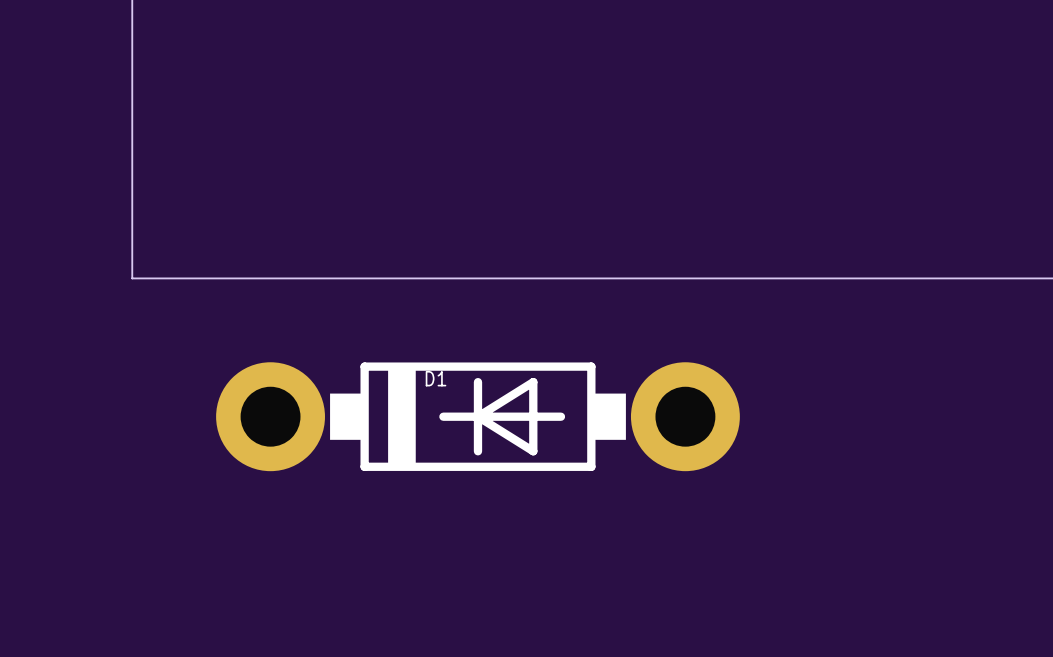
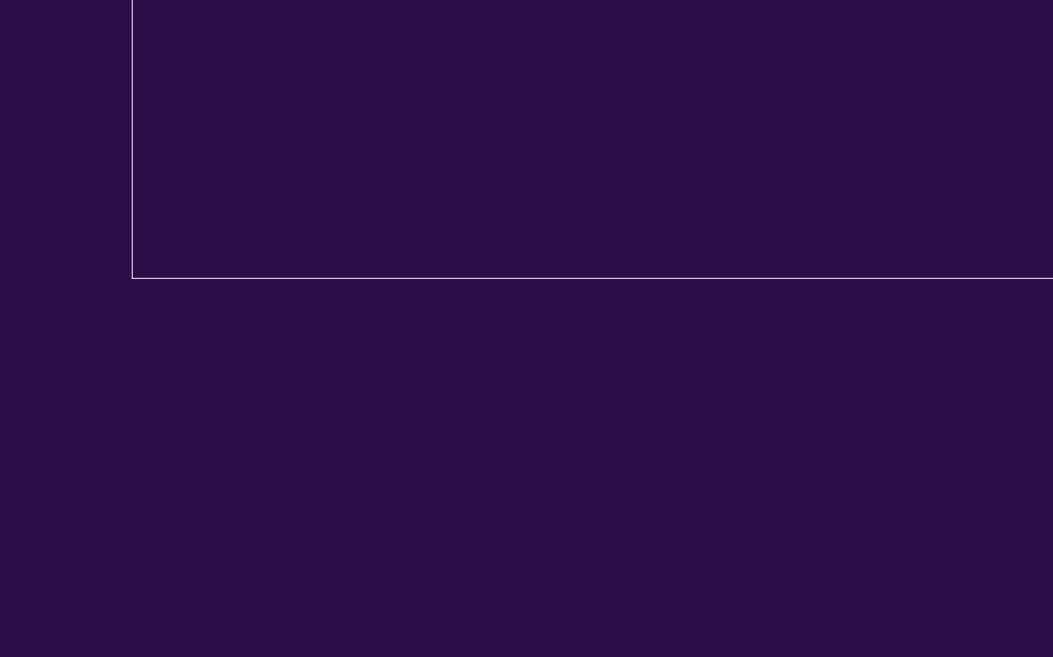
D1: (477, 416) -> none

